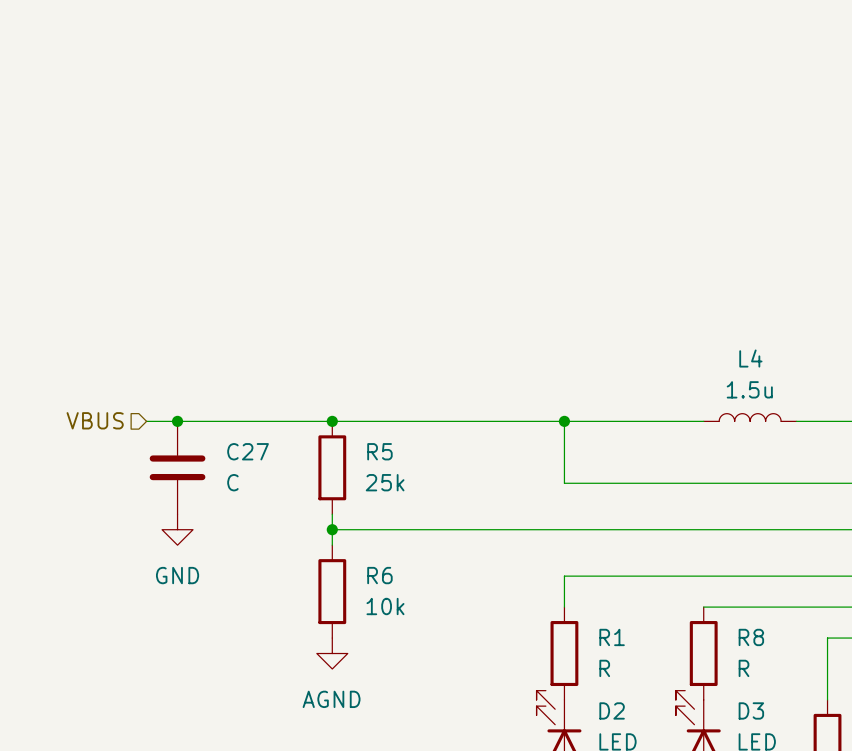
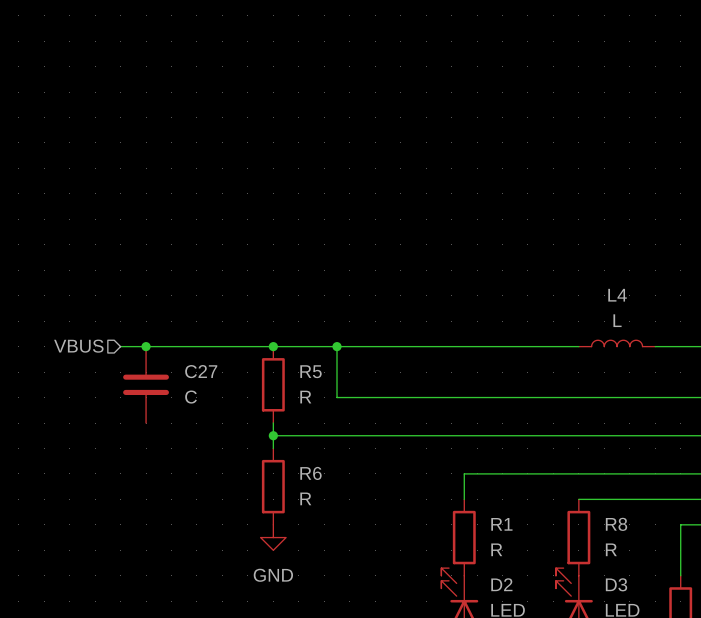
L4 value: 1.5u (749, 389) -> L (617, 320)
junction: none -> (337, 346)
wire: (564, 421) (564, 483) -> (337, 346) (337, 397) (464, 397)
junction: (564, 421) -> none
R5 value: 25k (385, 482) -> R (305, 397)
power symbol: GND (177, 529) -> none
R6 value: 10k (385, 606) -> R (305, 498)
power symbol: AGND (332, 653) -> GND (273, 537)

